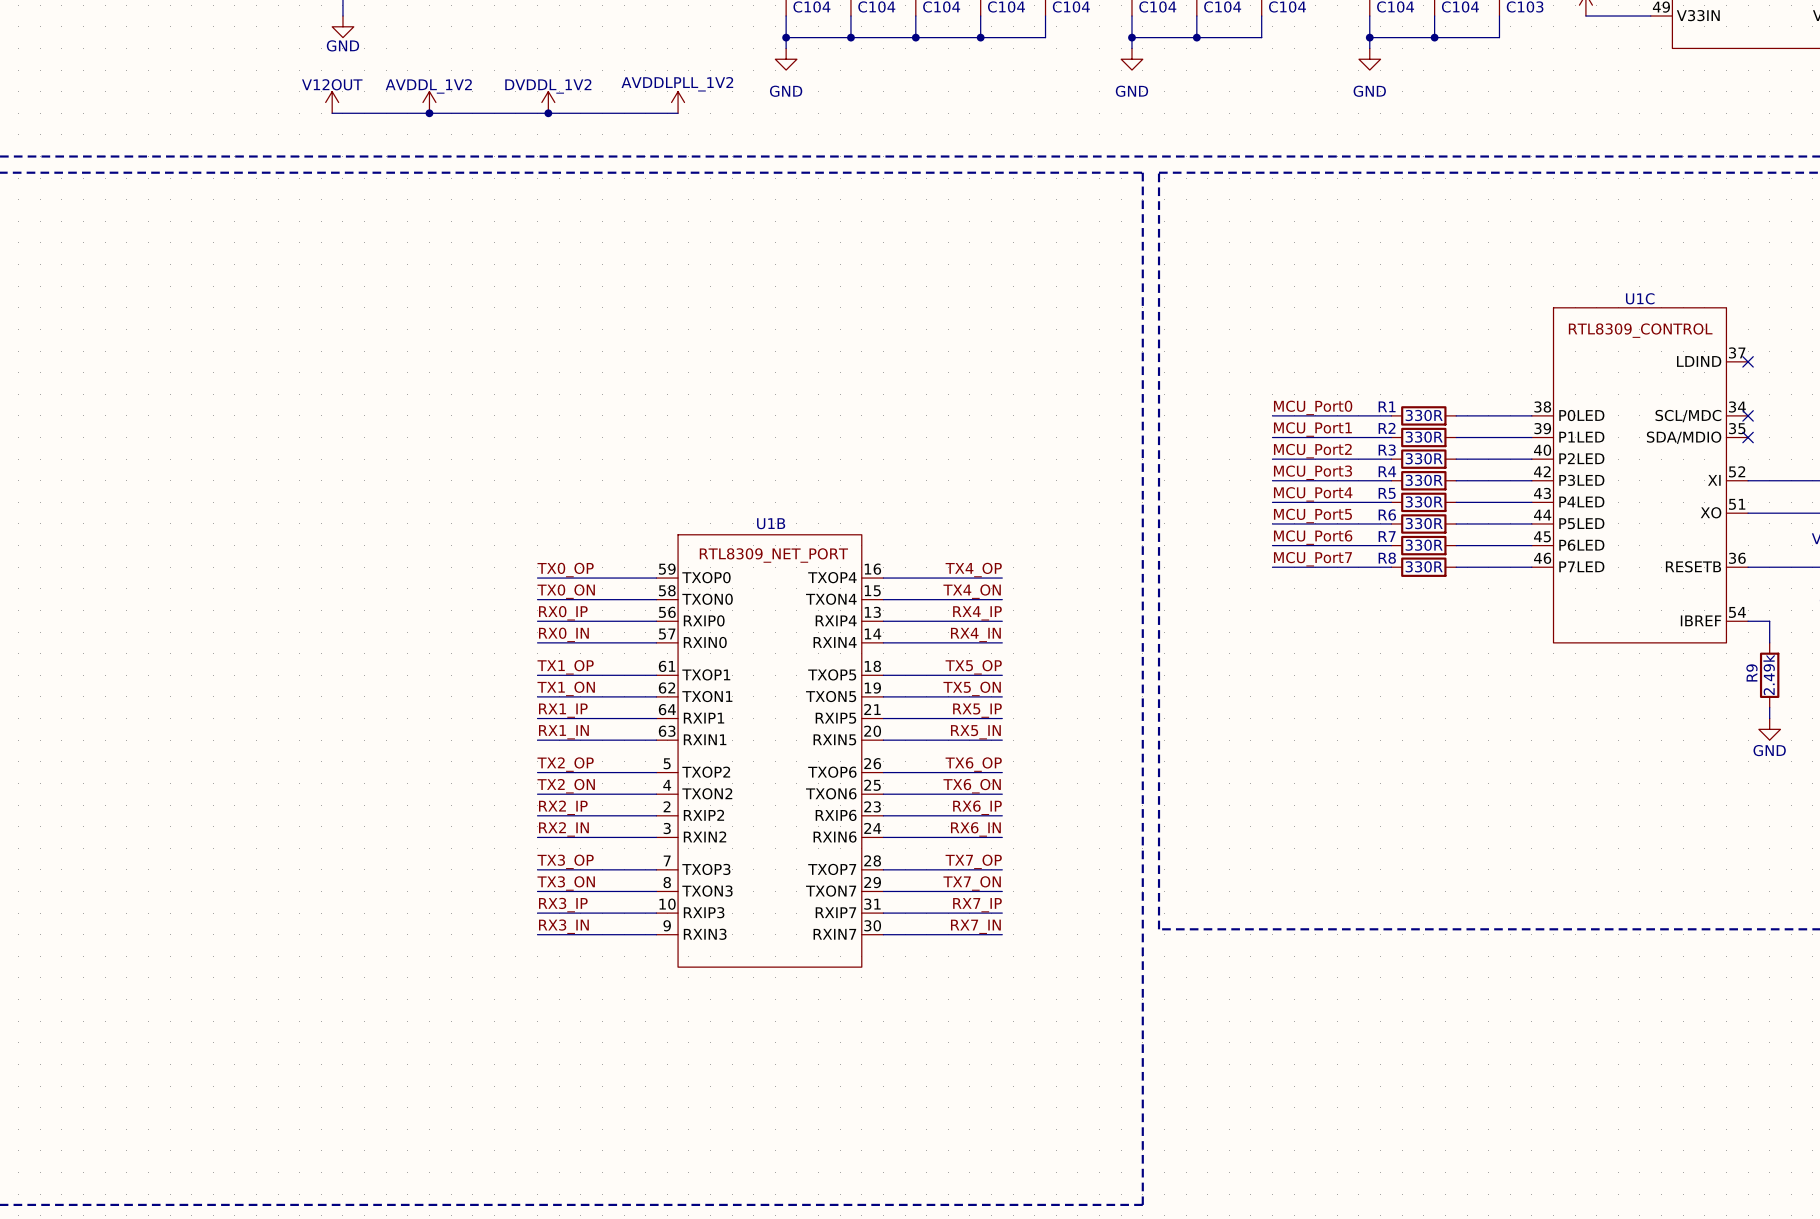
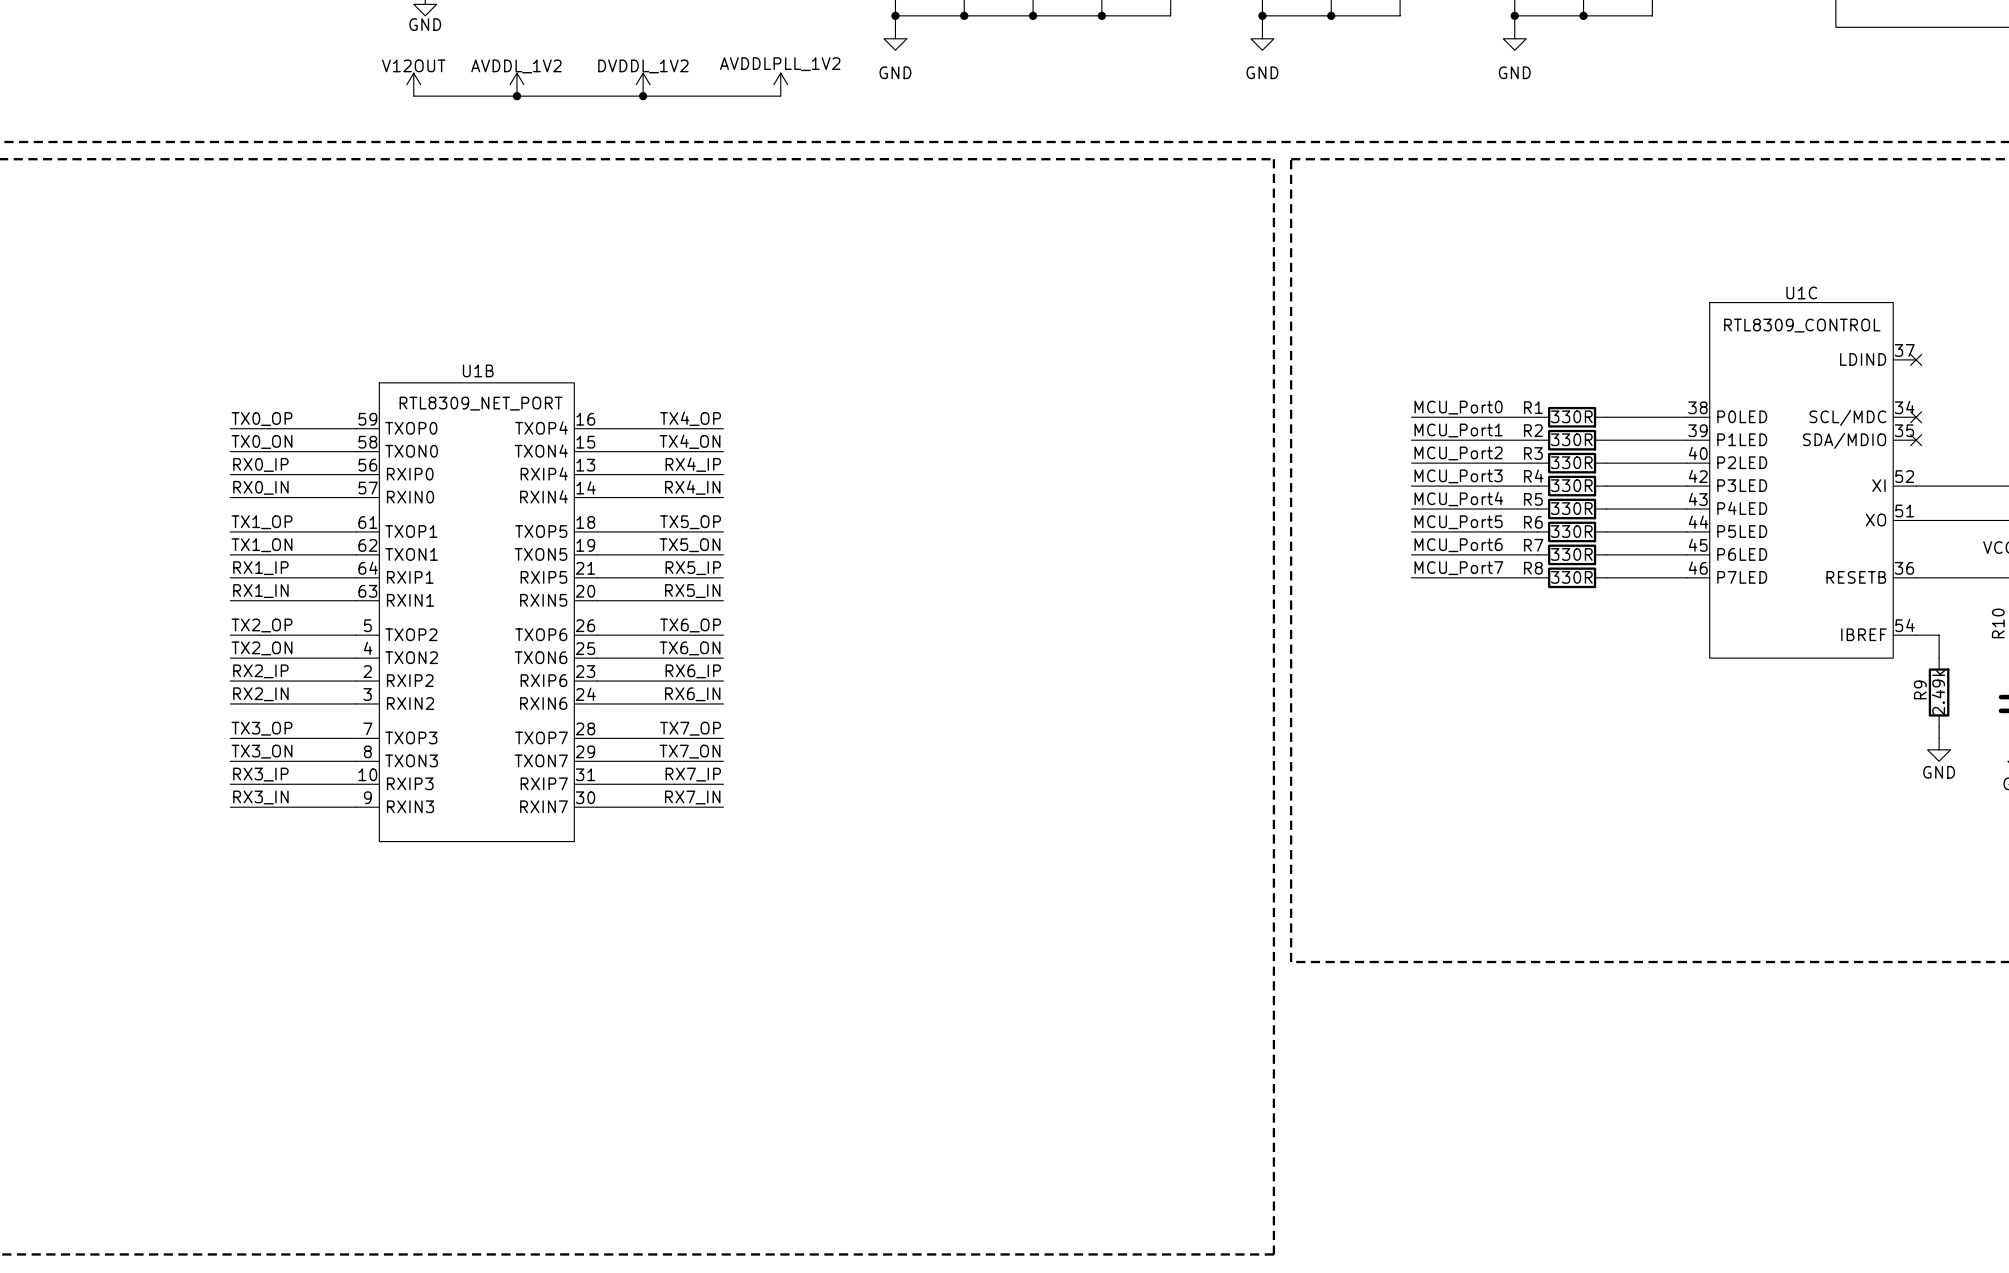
label: none -> TX0_OP (262, 419)
label: none -> TX4_OP (690, 418)
wire: none -> (230, 428) (356, 428)
wire: none -> (597, 428) (723, 428)
label: none -> TX0_ON (262, 441)
label: none -> TX4_ON (690, 441)
wire: none -> (230, 451) (356, 451)
wire: none -> (597, 451) (723, 451)
label: none -> RX0_IP (260, 464)
label: none -> RX4_IP (693, 464)
wire: none -> (230, 474) (356, 474)
label: none -> RX0_IN (260, 487)
label: none -> RX4_IN (692, 487)
wire: none -> (230, 497) (356, 497)
label: none -> TX1_OP (262, 522)
label: none -> TX5_OP (690, 522)
wire: none -> (230, 531) (356, 531)
wire: none -> (597, 531) (723, 531)
label: none -> TX1_ON (262, 545)
label: none -> TX5_ON (690, 545)
wire: none -> (230, 554) (356, 554)
wire: none -> (597, 554) (723, 554)
label: none -> RX1_IP (260, 568)
label: none -> RX5_IP (693, 568)
wire: none -> (230, 577) (356, 577)
label: TX0_OP (565, 570) -> none
label: TX4_OP (973, 570) -> none
wire: (537, 578) (656, 578) -> (597, 474) (723, 474)
wire: (883, 578) (1002, 578) -> none
label: none -> RX1_IN (260, 591)
label: none -> RX5_IN (692, 591)
wire: none -> (230, 600) (356, 600)
label: TX0_ON (566, 591) -> TX6_OP (690, 625)
label: TX4_ON (972, 591) -> none
wire: (537, 599) (656, 599) -> (597, 497) (723, 497)
wire: (883, 599) (1002, 599) -> none
label: none -> TX2_OP (262, 625)
label: RX0_IP (563, 613) -> none
label: RX4_IP (977, 613) -> none
wire: none -> (230, 635) (356, 635)
wire: (624, 621) (656, 621) -> (597, 635) (631, 635)
wire: (883, 621) (1002, 621) -> none
label: none -> TX2_ON (262, 648)
label: RX0_IN (563, 634) -> RX6_IP (693, 671)
label: none -> TX6_ON (690, 648)
label: RX4_IN (975, 634) -> none
wire: none -> (230, 658) (356, 658)
wire: (624, 642) (656, 642) -> (597, 658) (631, 658)
wire: (883, 642) (1002, 642) -> none
label: none -> RX2_IP (260, 671)
wire: none -> (230, 681) (356, 681)
label: TX1_OP (565, 667) -> none
label: TX5_OP (973, 667) -> none
wire: (537, 675) (656, 675) -> (597, 577) (723, 577)
wire: (883, 675) (1002, 675) -> none
label: none -> RX2_IN (260, 694)
label: none -> RX6_IN (692, 694)
wire: none -> (230, 703) (356, 703)
label: TX1_ON (566, 688) -> TX7_OP (690, 728)
label: TX5_ON (972, 688) -> none
wire: (537, 696) (656, 696) -> (597, 600) (723, 600)
wire: (883, 696) (1002, 696) -> none
label: none -> TX3_OP (262, 728)
label: RX1_IP (563, 710) -> none
label: RX5_IP (977, 710) -> none
wire: none -> (230, 738) (356, 738)
wire: (624, 718) (656, 718) -> (597, 738) (631, 738)
wire: (883, 718) (1002, 718) -> none
label: none -> TX3_ON (262, 751)
label: RX1_IN (563, 732) -> RX7_IP (693, 774)
label: none -> TX7_ON (690, 751)
label: RX5_IN (975, 732) -> none
wire: none -> (230, 761) (356, 761)
wire: (624, 740) (656, 740) -> (597, 761) (631, 761)
wire: (883, 740) (1002, 740) -> none
U1B position: (769, 750) -> (476, 612)
label: none -> RX3_IP (260, 774)
wire: none -> (230, 784) (356, 784)
label: TX2_OP (565, 764) -> none
label: TX6_OP (973, 764) -> none
wire: (537, 772) (656, 772) -> (597, 681) (723, 681)
wire: (883, 772) (1002, 772) -> none
label: none -> RX3_IN (260, 797)
label: none -> RX7_IN (692, 797)
wire: none -> (230, 807) (356, 807)
label: TX2_ON (566, 786) -> none
label: TX6_ON (972, 786) -> none
wire: (537, 794) (656, 794) -> (597, 703) (723, 703)
wire: (883, 794) (1002, 794) -> none
label: RX2_IP (563, 807) -> none
label: RX6_IP (977, 807) -> none
wire: (537, 815) (656, 815) -> none
wire: (883, 815) (1002, 815) -> none
label: RX2_IN (563, 829) -> none
label: RX6_IN (975, 829) -> none
wire: (537, 837) (656, 837) -> none
wire: (883, 837) (1002, 837) -> none
label: TX3_OP (565, 861) -> none
label: TX7_OP (973, 861) -> none
wire: (537, 869) (656, 869) -> (597, 784) (723, 784)
wire: (883, 869) (1002, 869) -> none
label: TX3_ON (566, 883) -> none
label: TX7_ON (972, 883) -> none
wire: (537, 891) (656, 891) -> (597, 807) (723, 807)
wire: (883, 891) (1002, 891) -> none
label: RX3_IP (563, 905) -> none
label: RX7_IP (977, 905) -> none
wire: (537, 913) (656, 913) -> none
wire: (883, 913) (1002, 913) -> none
label: RX3_IN (563, 926) -> none
label: RX7_IN (975, 926) -> none
wire: (537, 934) (656, 934) -> none
wire: (883, 934) (1002, 934) -> none

